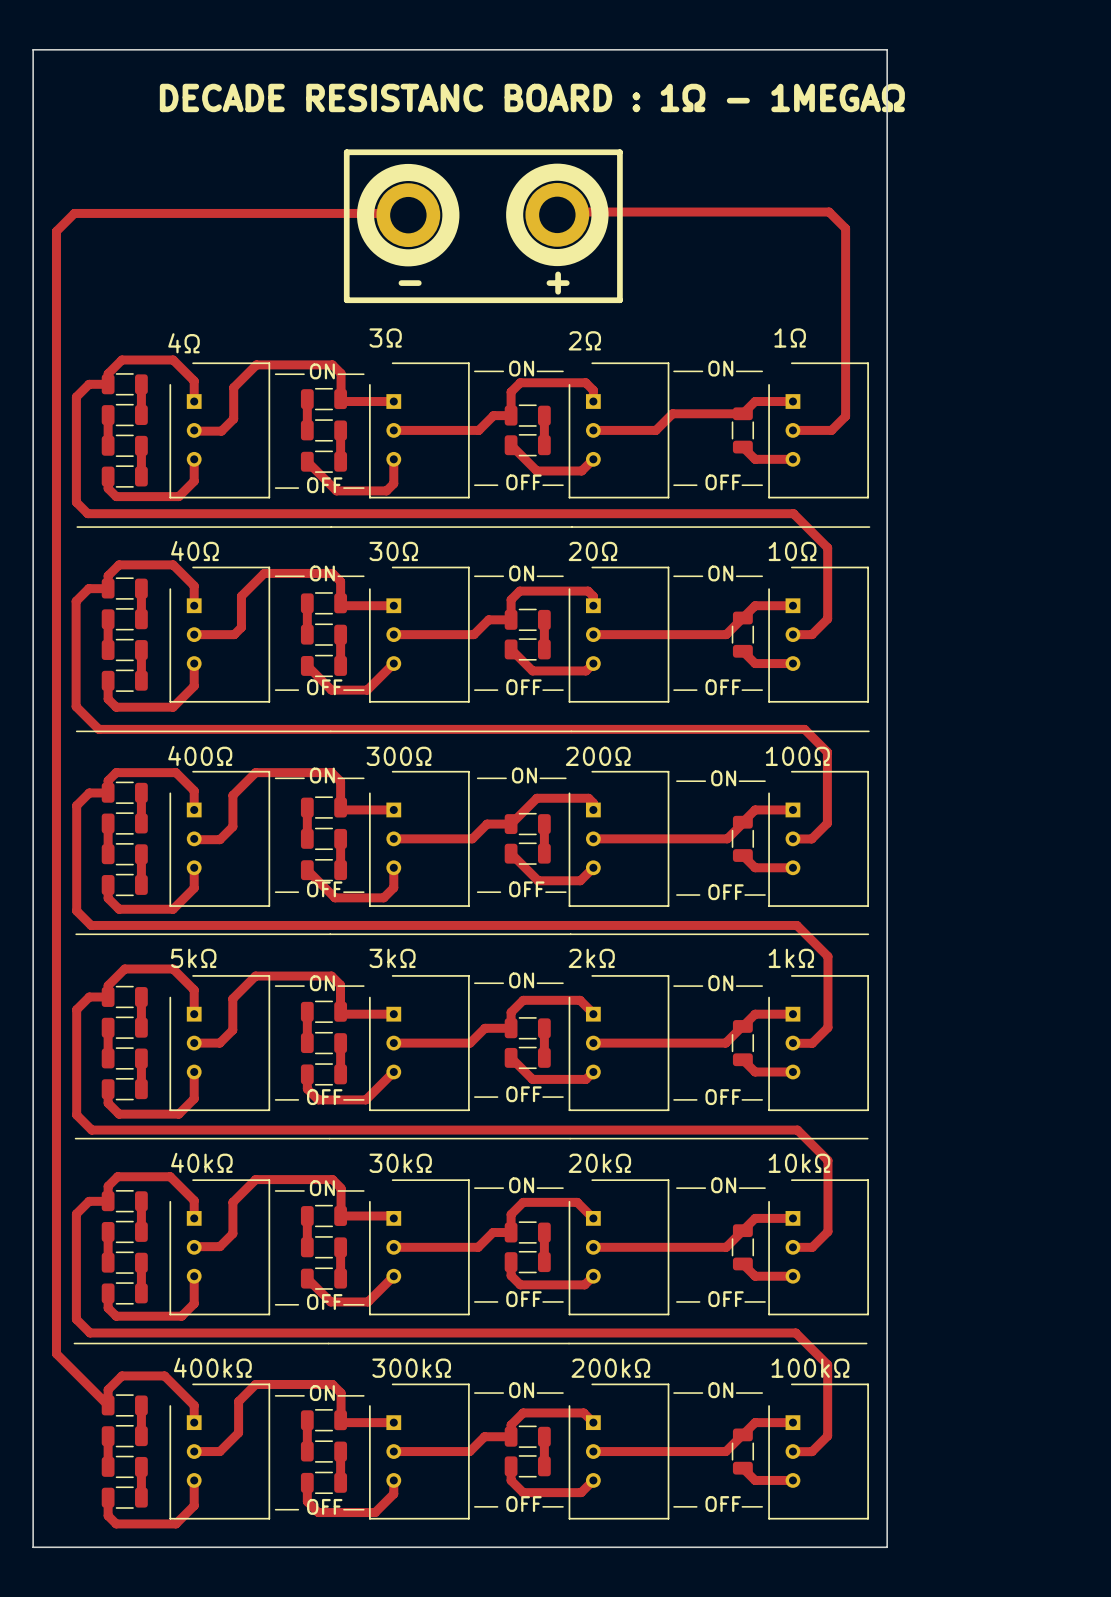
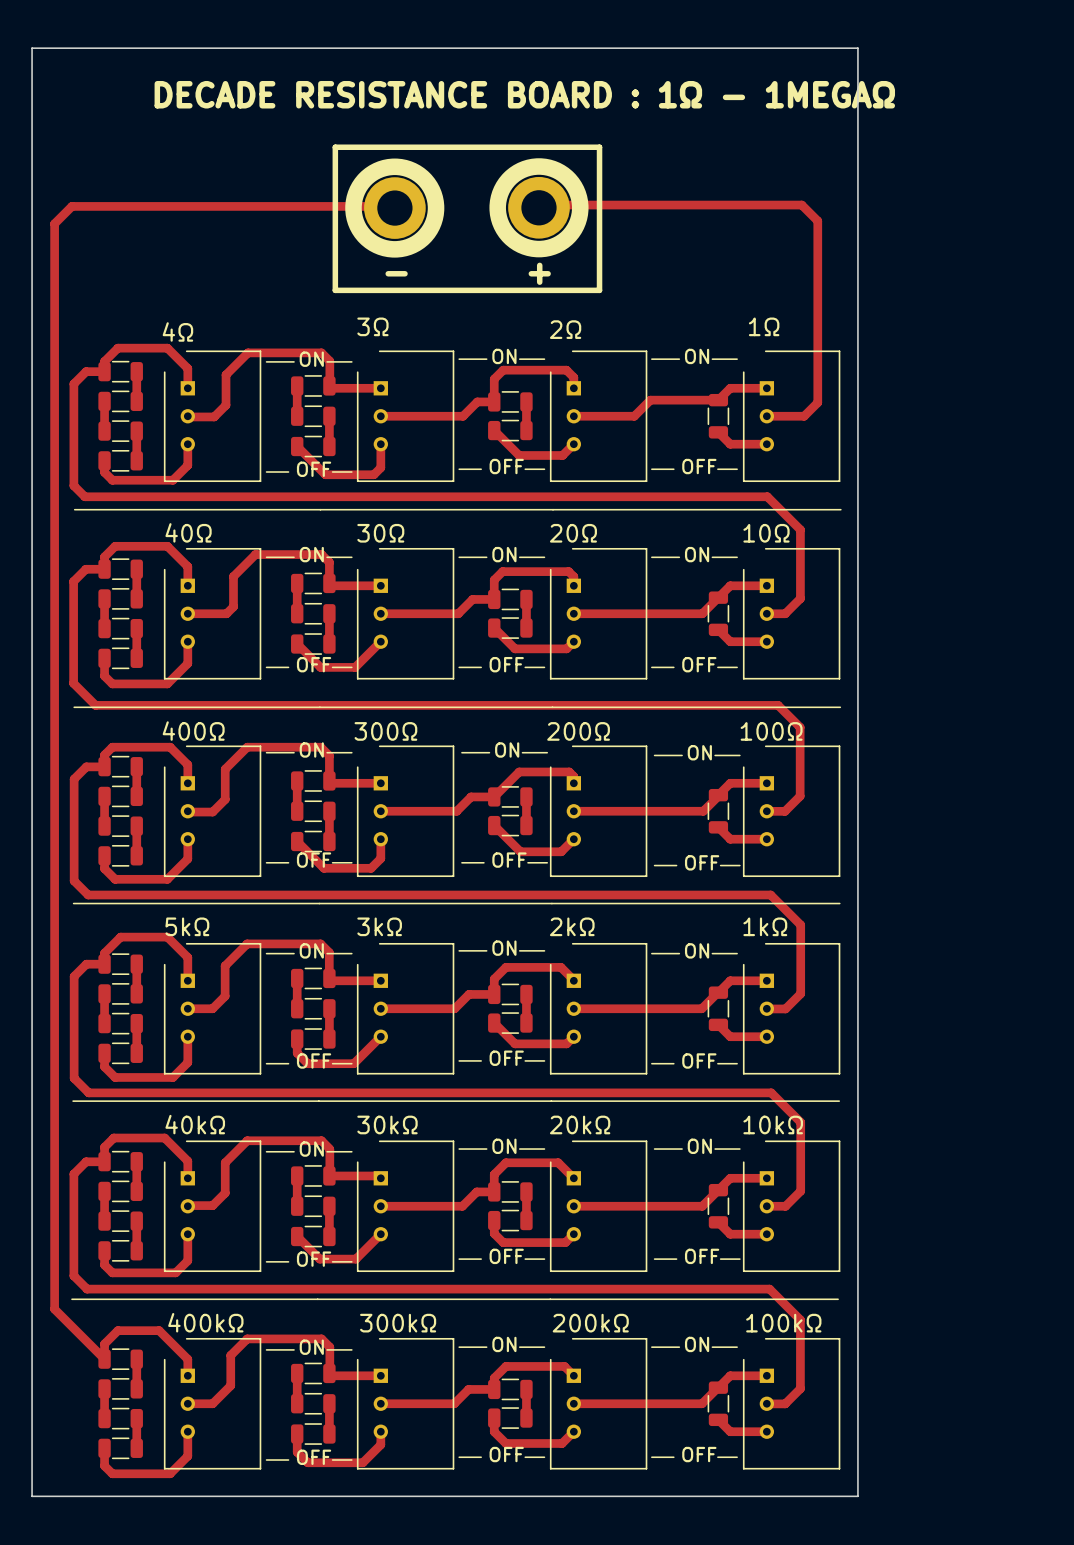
text: DECADE RESISTANC BOARD : 1Ω - 1MEGAΩ (532, 97) -> DECADE RESISTANCE BOARD : 1Ω - 1MEGAΩ (524, 94)

